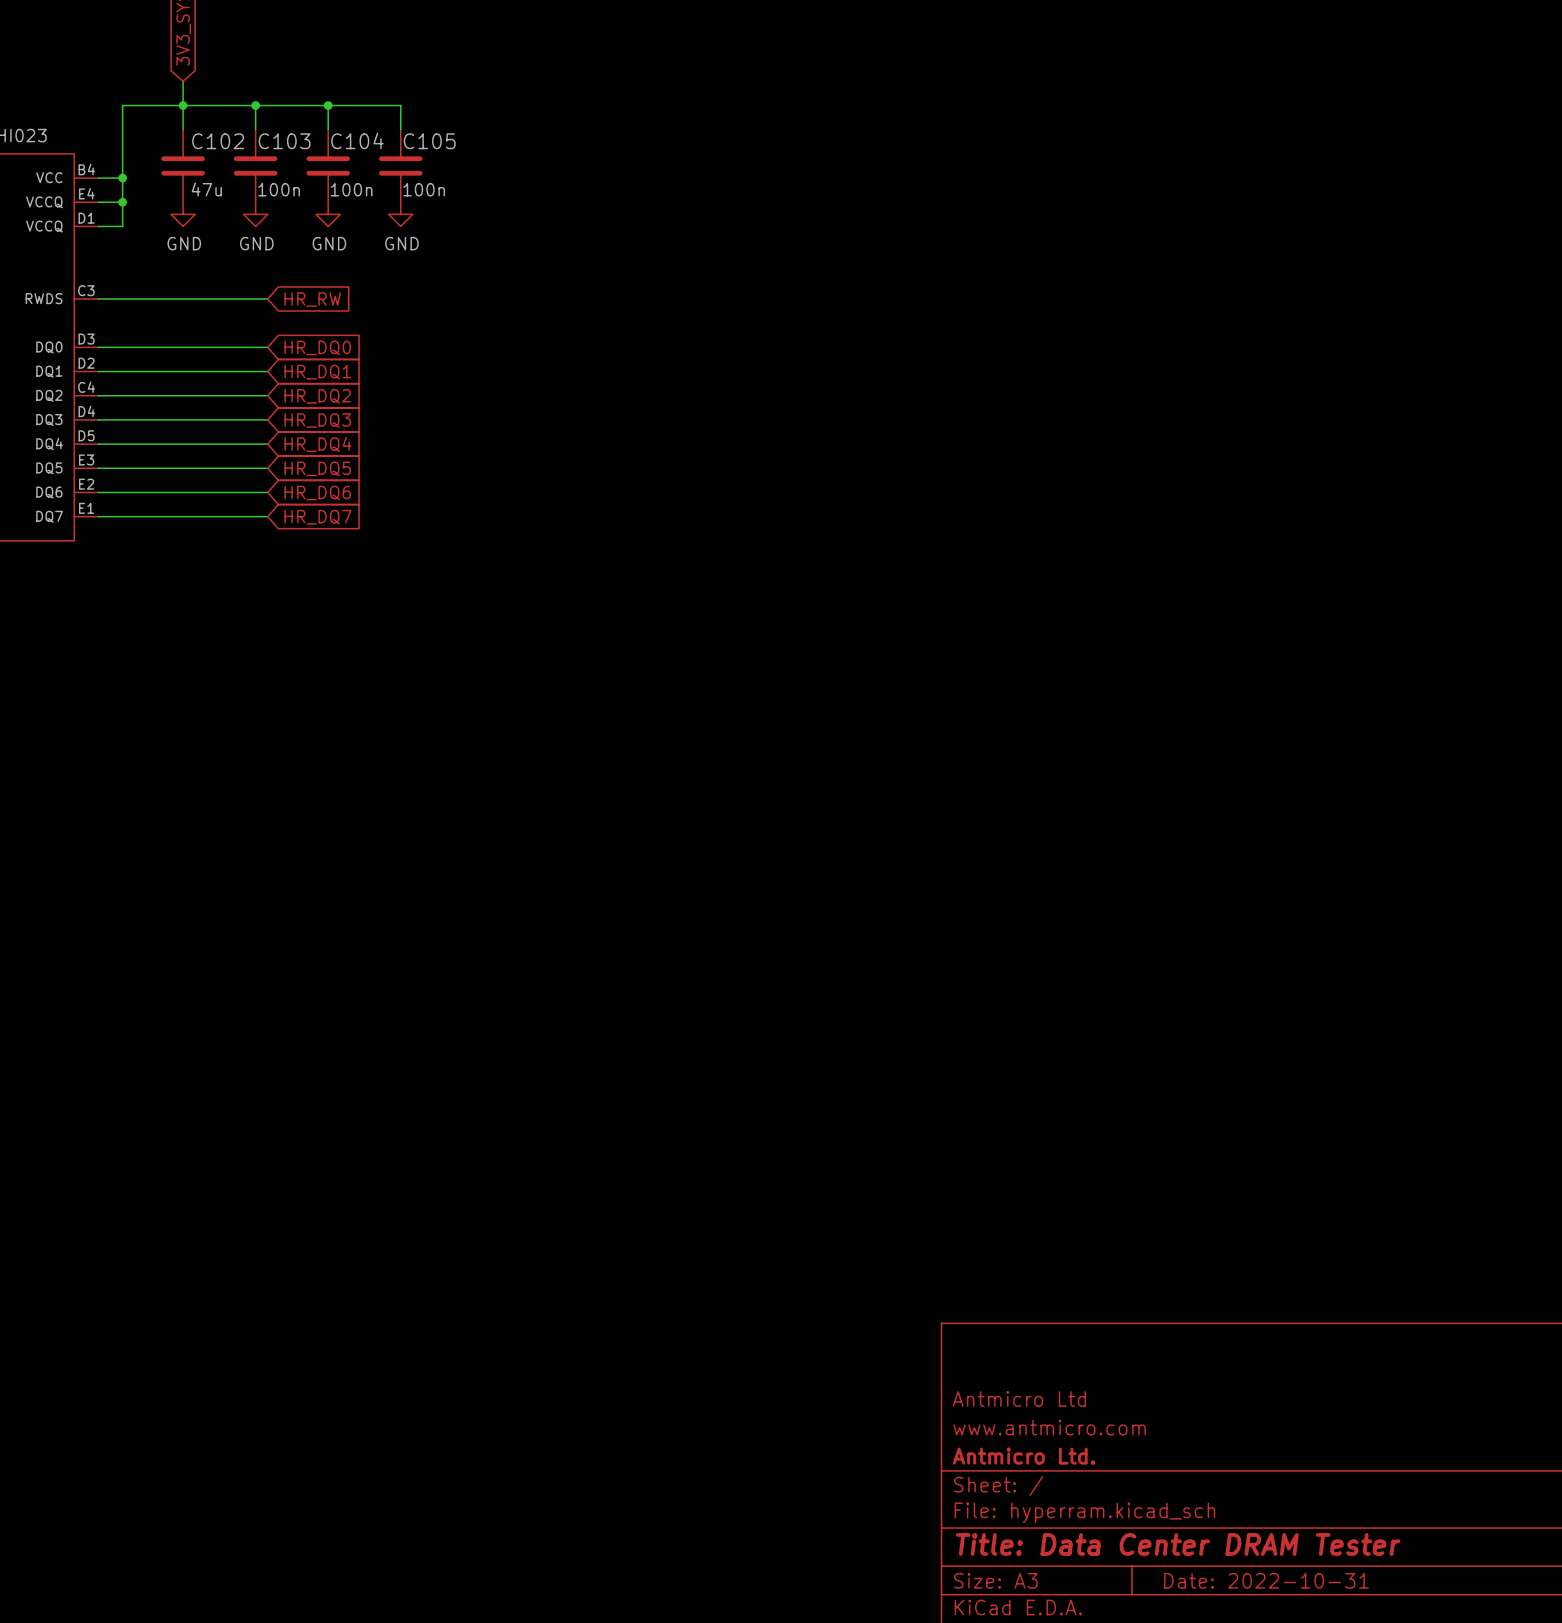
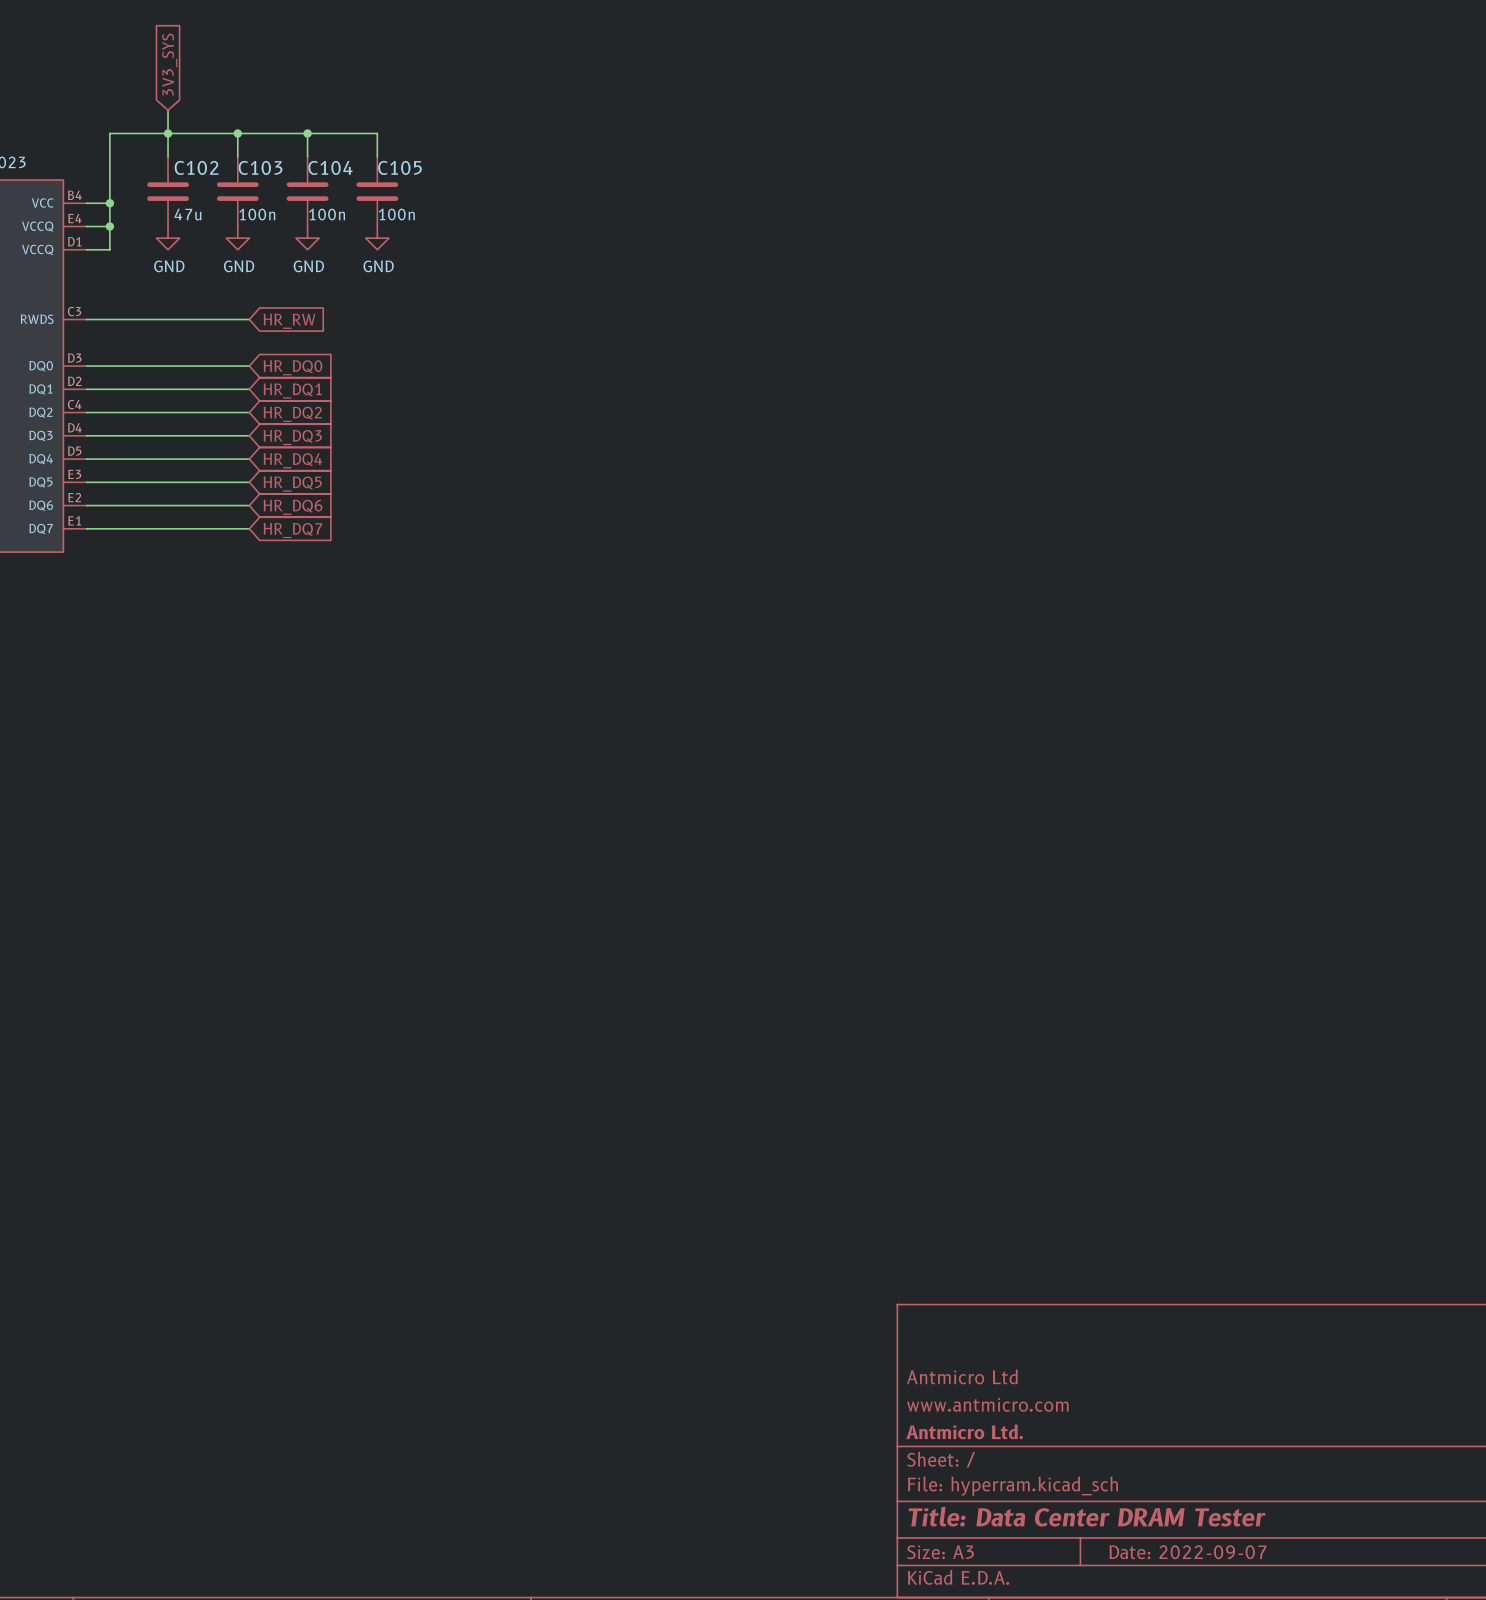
title block: Date: 2022-10-31 (1266, 1580) -> Date: 2022-09-07 (1187, 1552)

